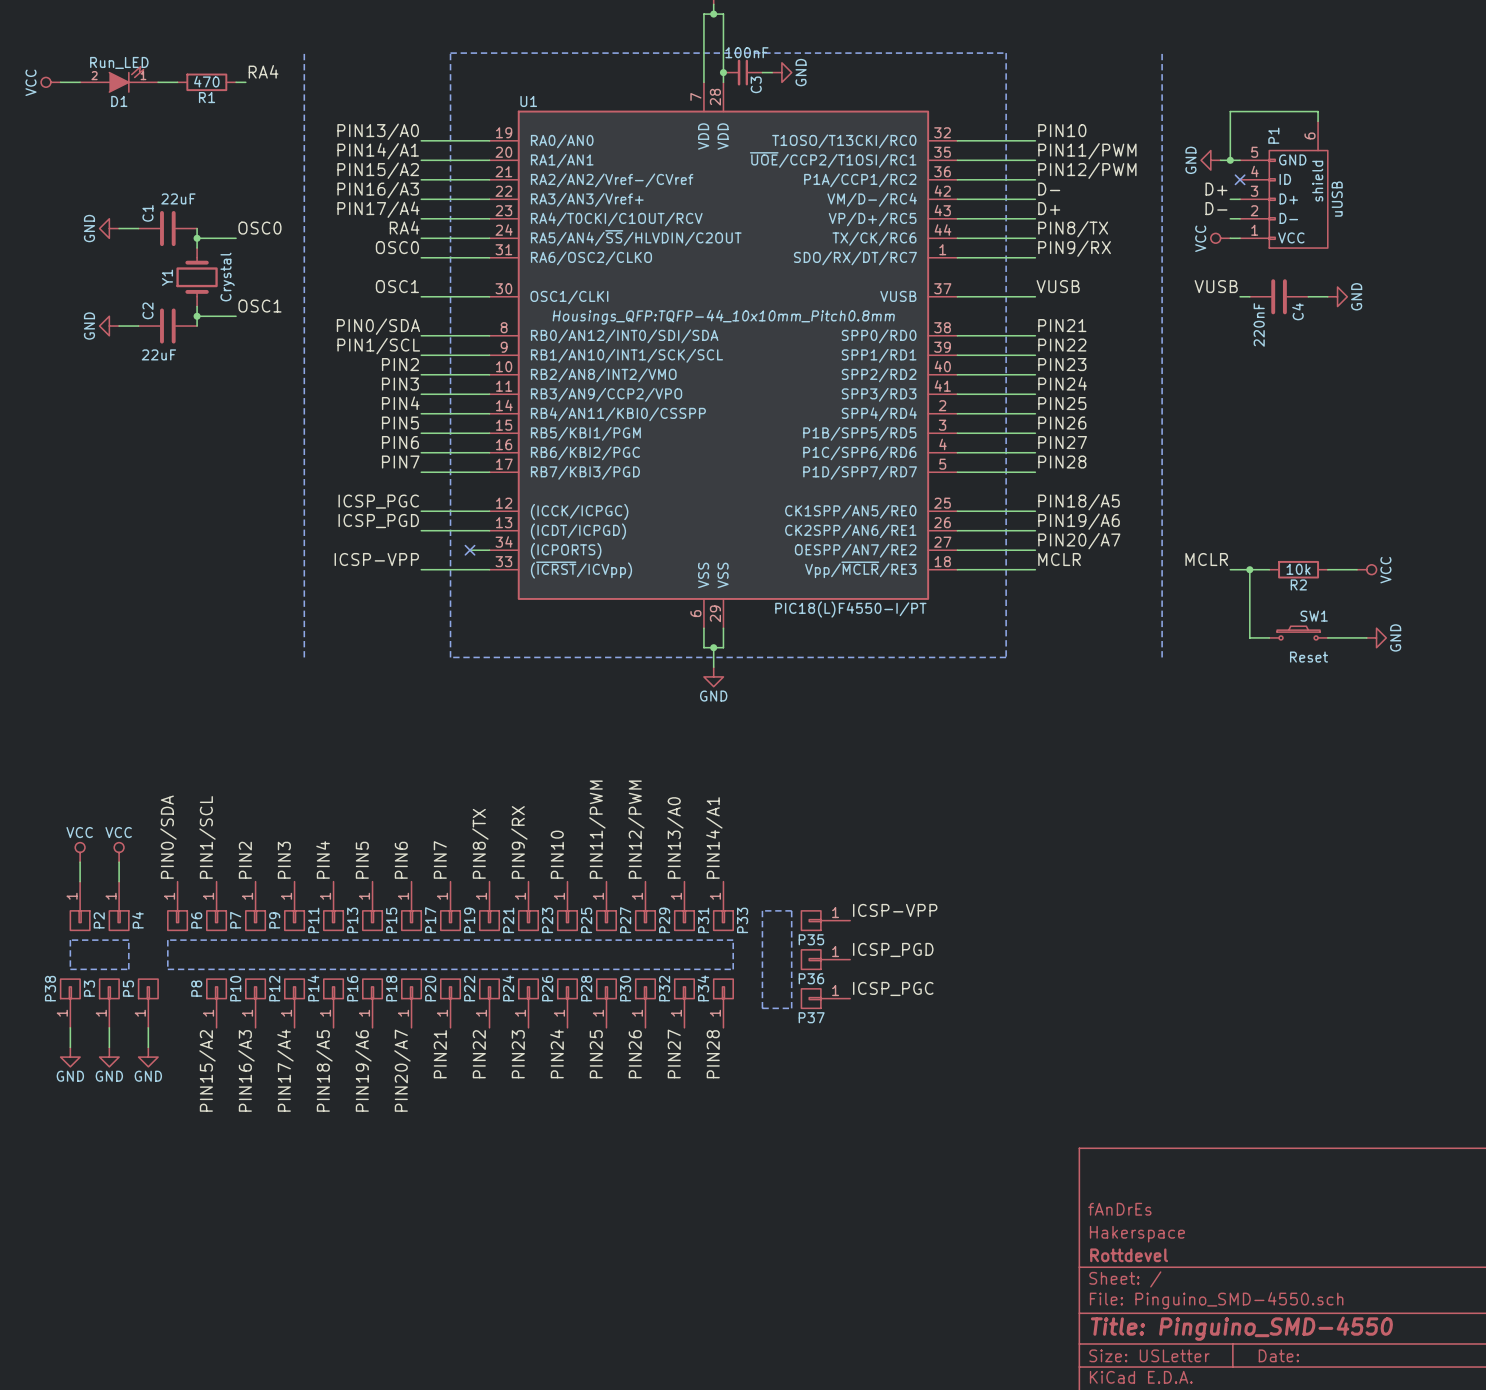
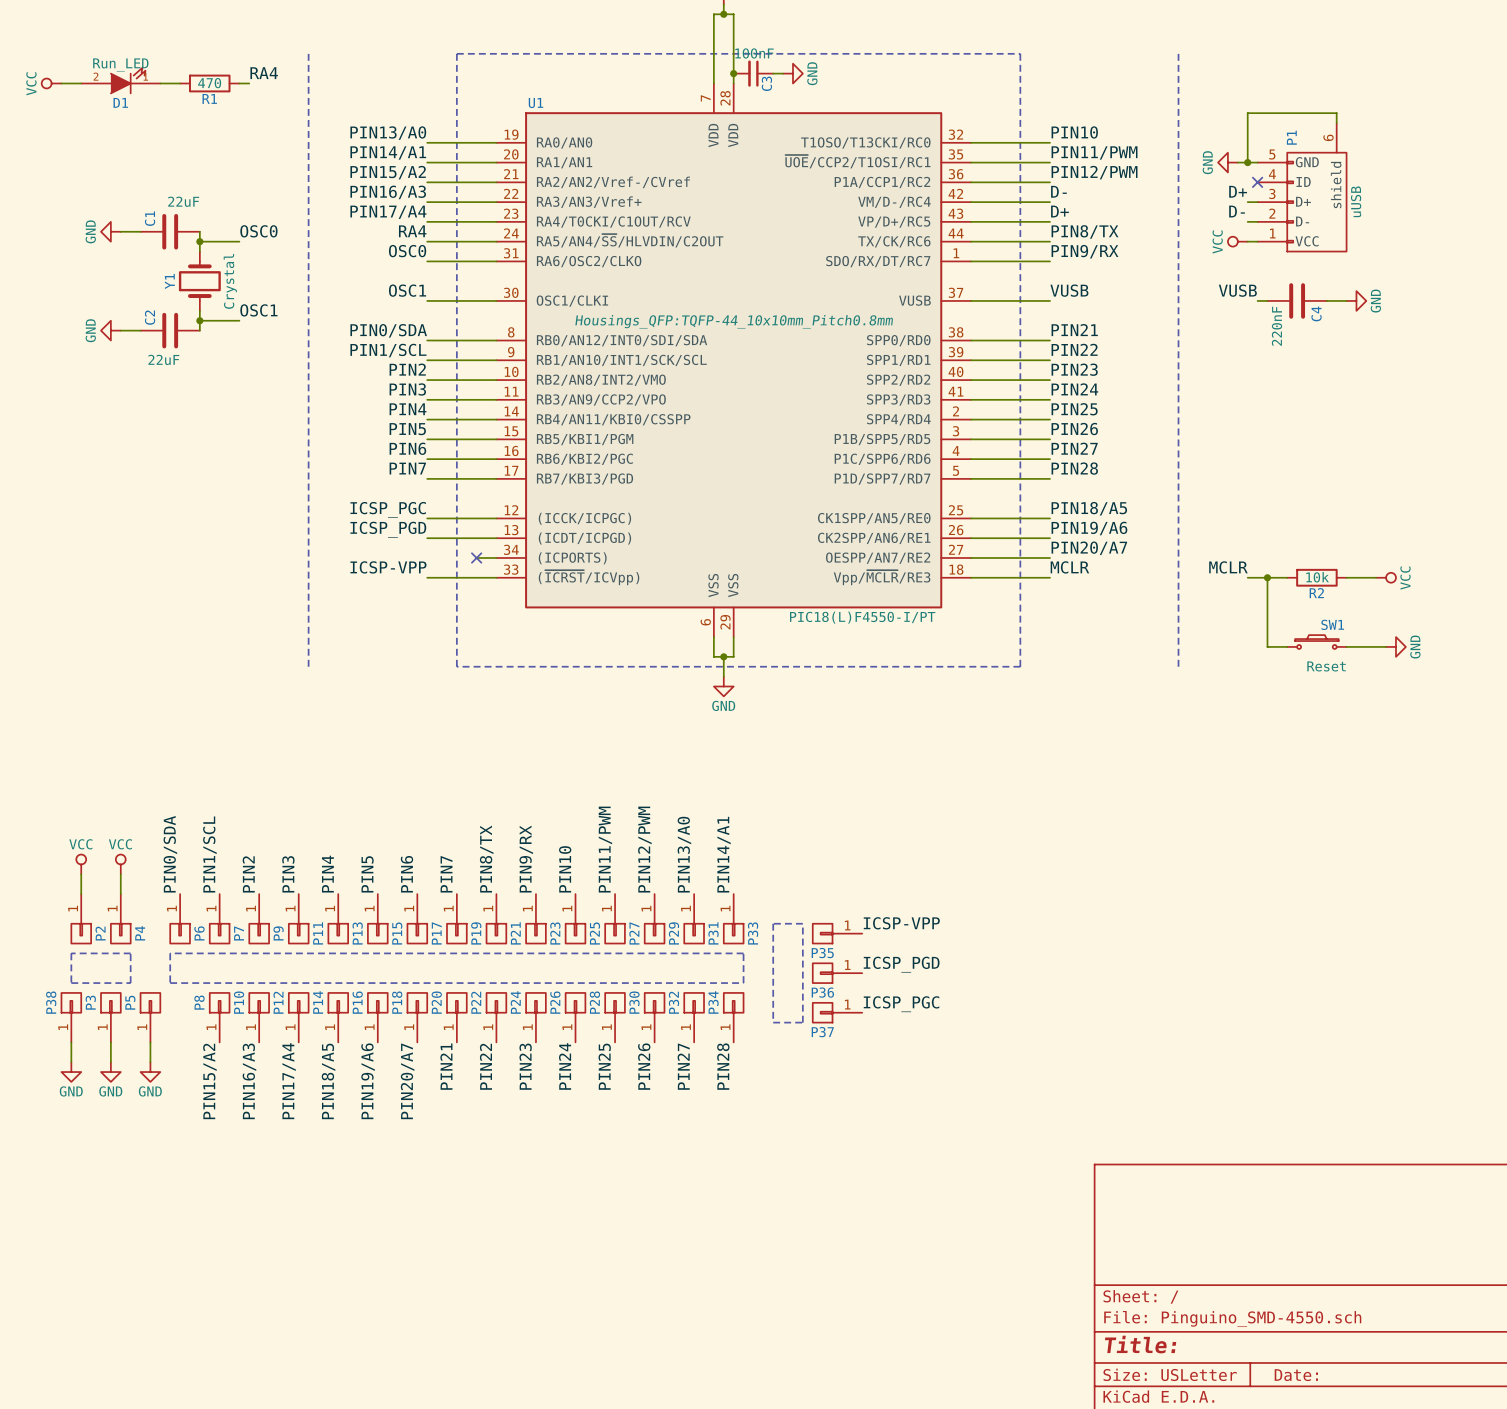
title block: fAnDrEs (1119, 1209) -> none
title block: Hakerspace (1137, 1234) -> none
title block: Rottdevel (1129, 1255) -> none
title block: Title: Pinguino_SMD-4550 (1241, 1328) -> Title: (1140, 1344)

